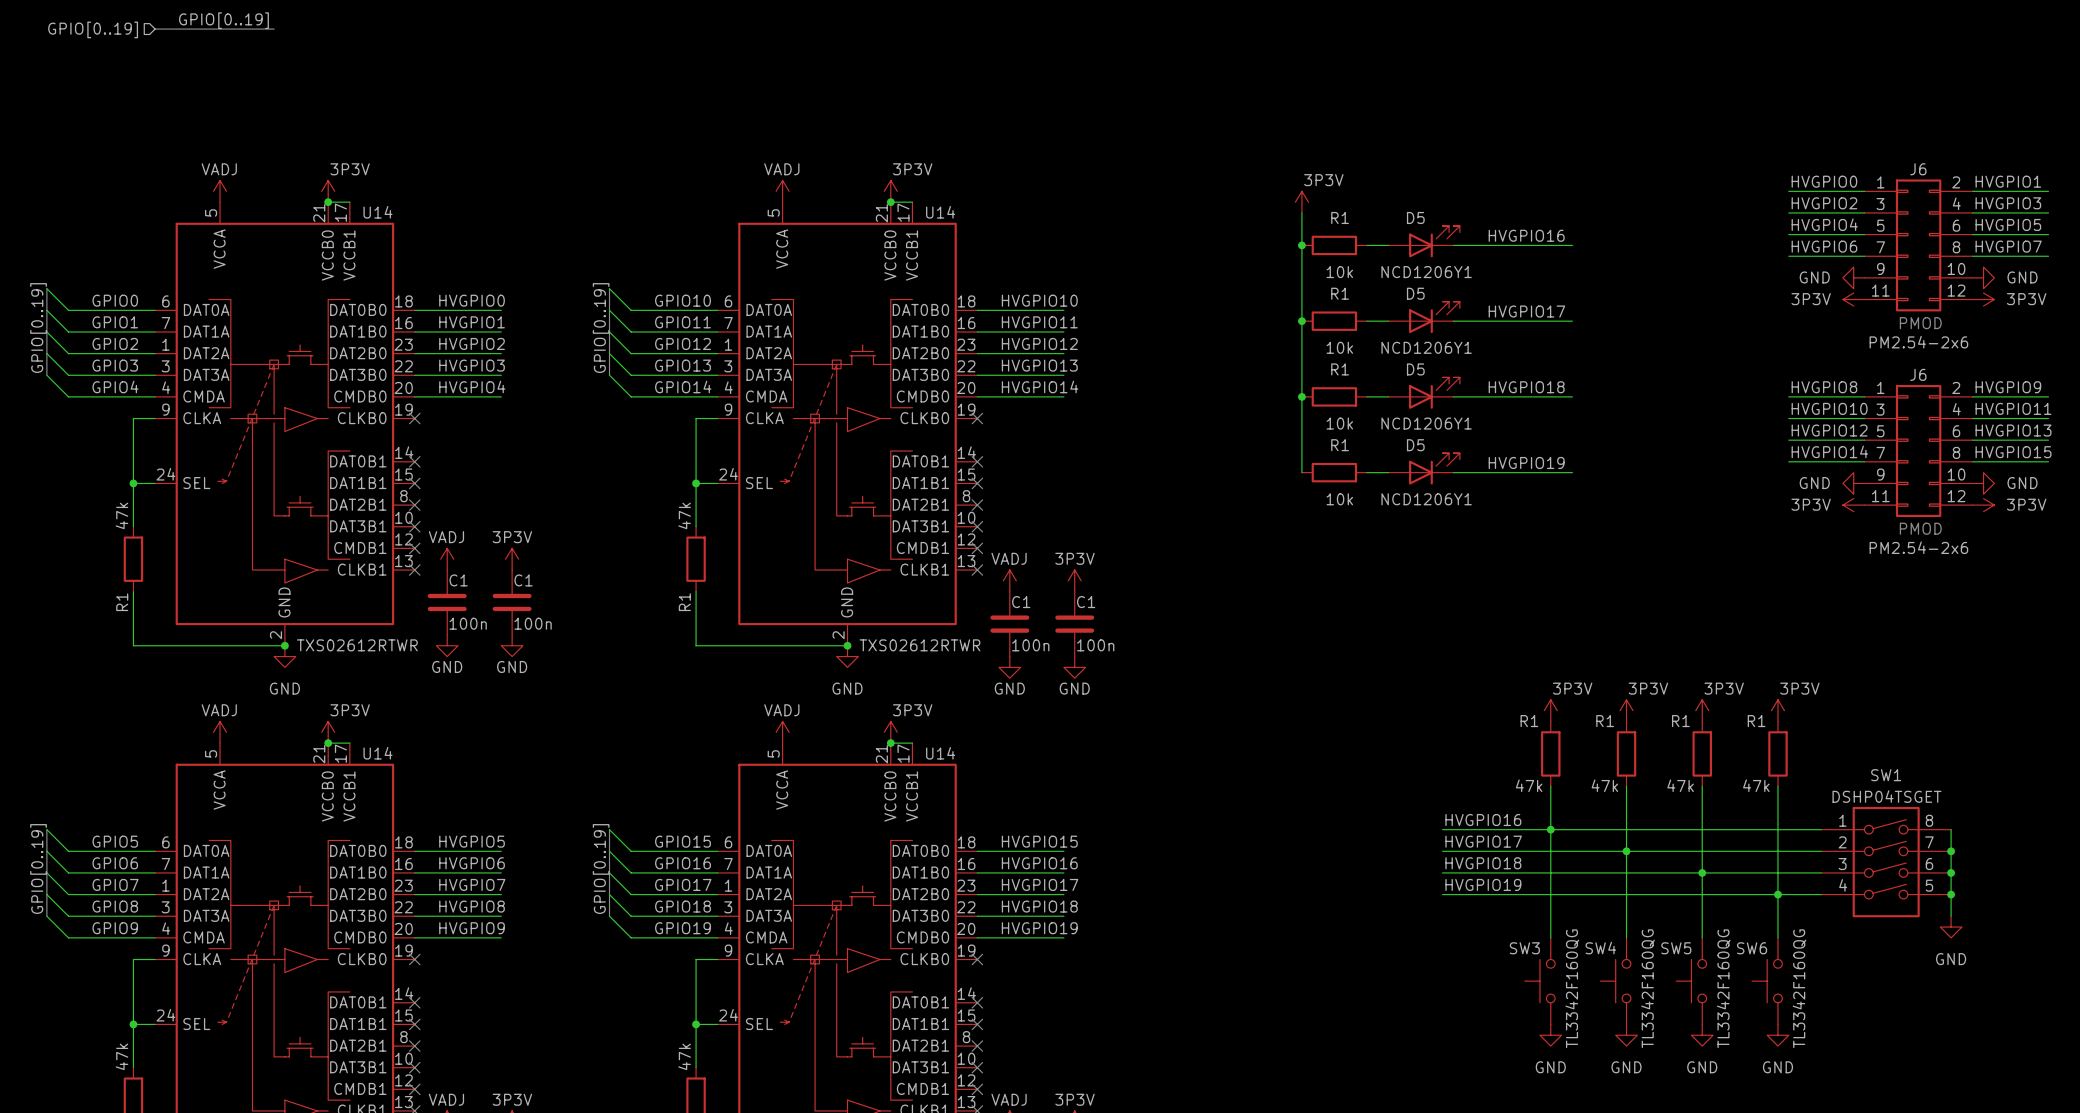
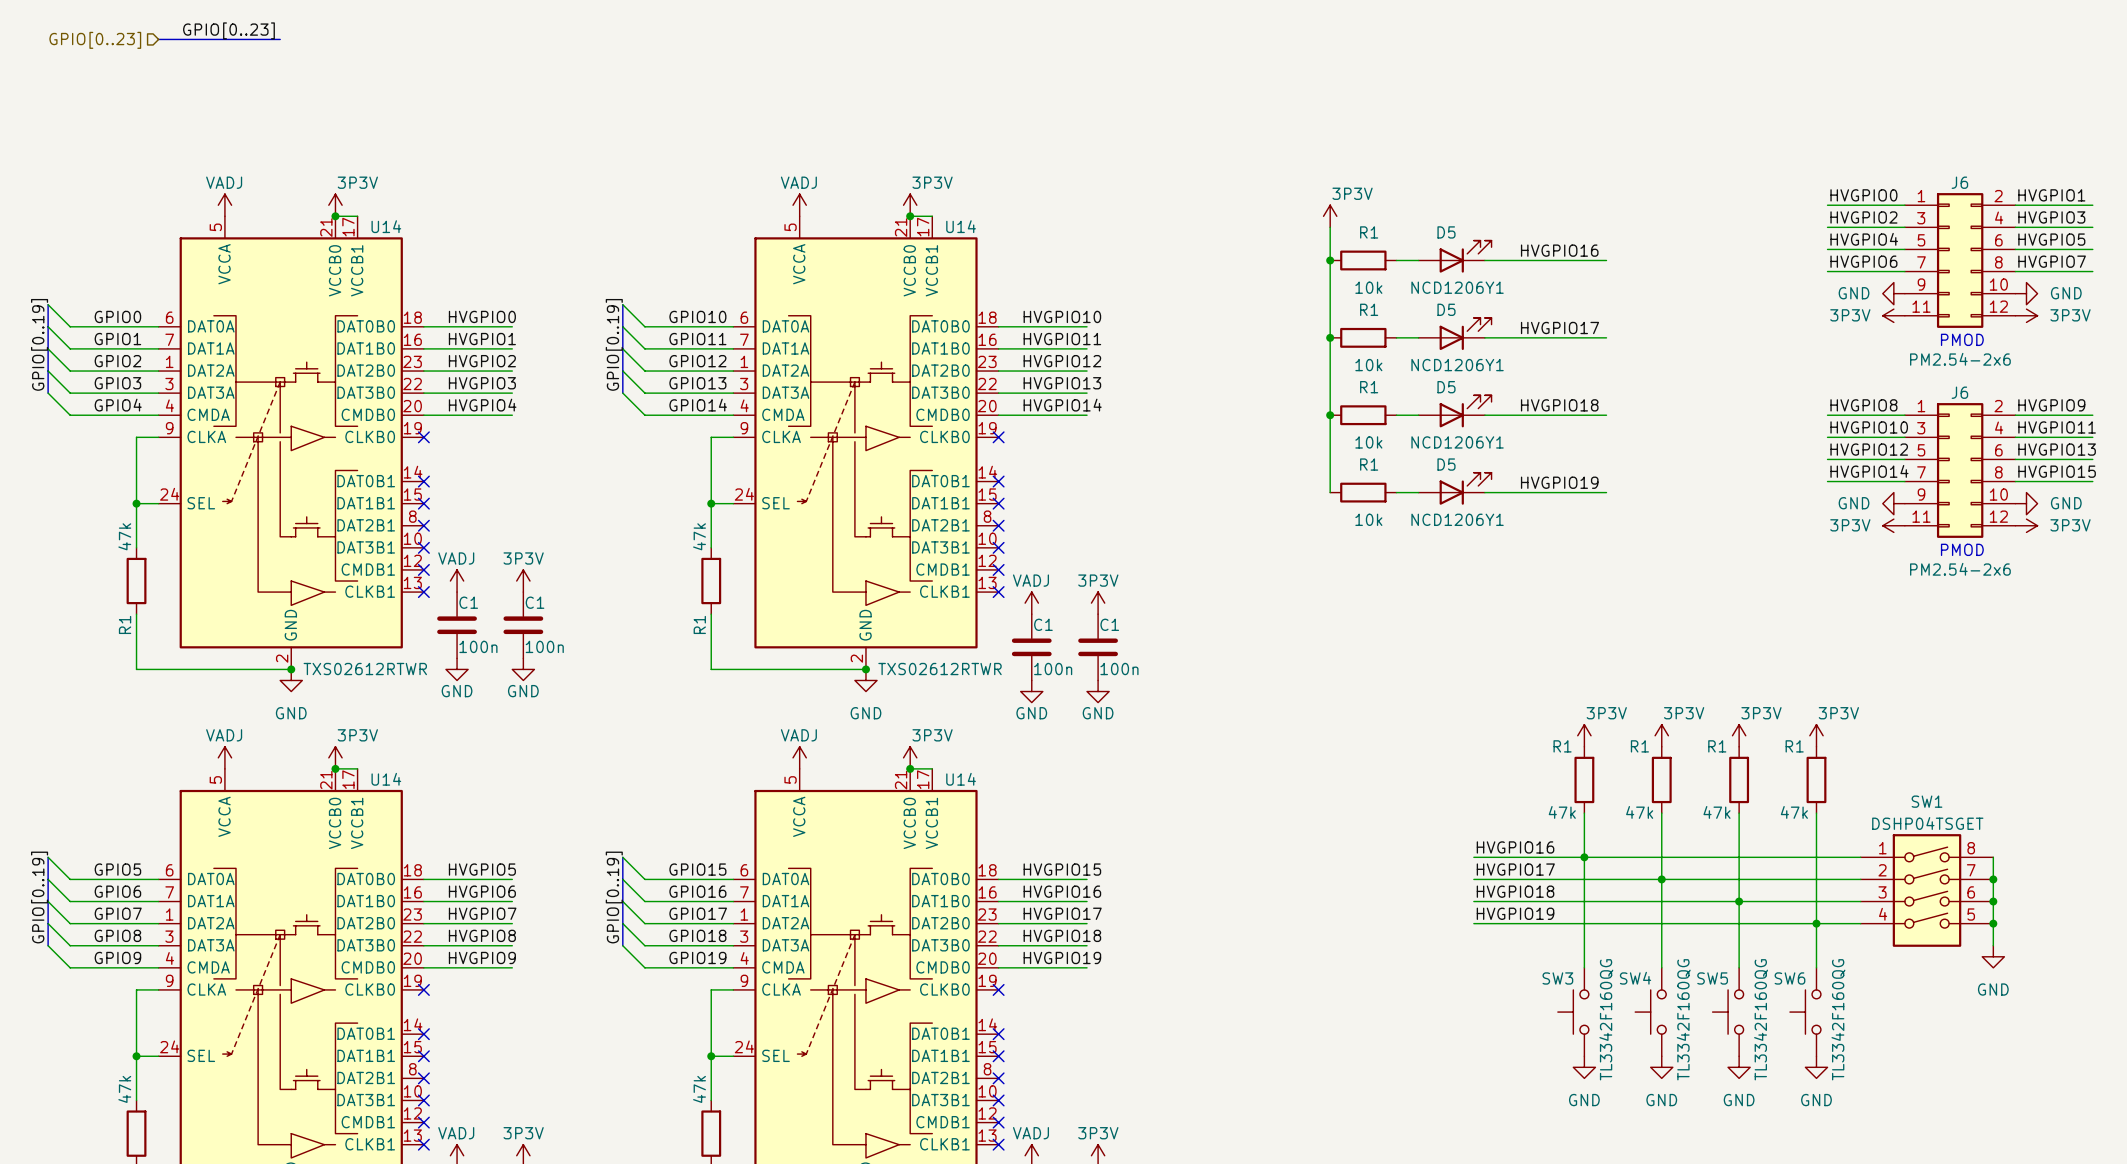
label: GPIO[0..19] (223, 20) -> GPIO[0..23] (228, 30)
hierarchical label: GPIO[0..19] (93, 29) -> GPIO[0..23] (95, 40)

